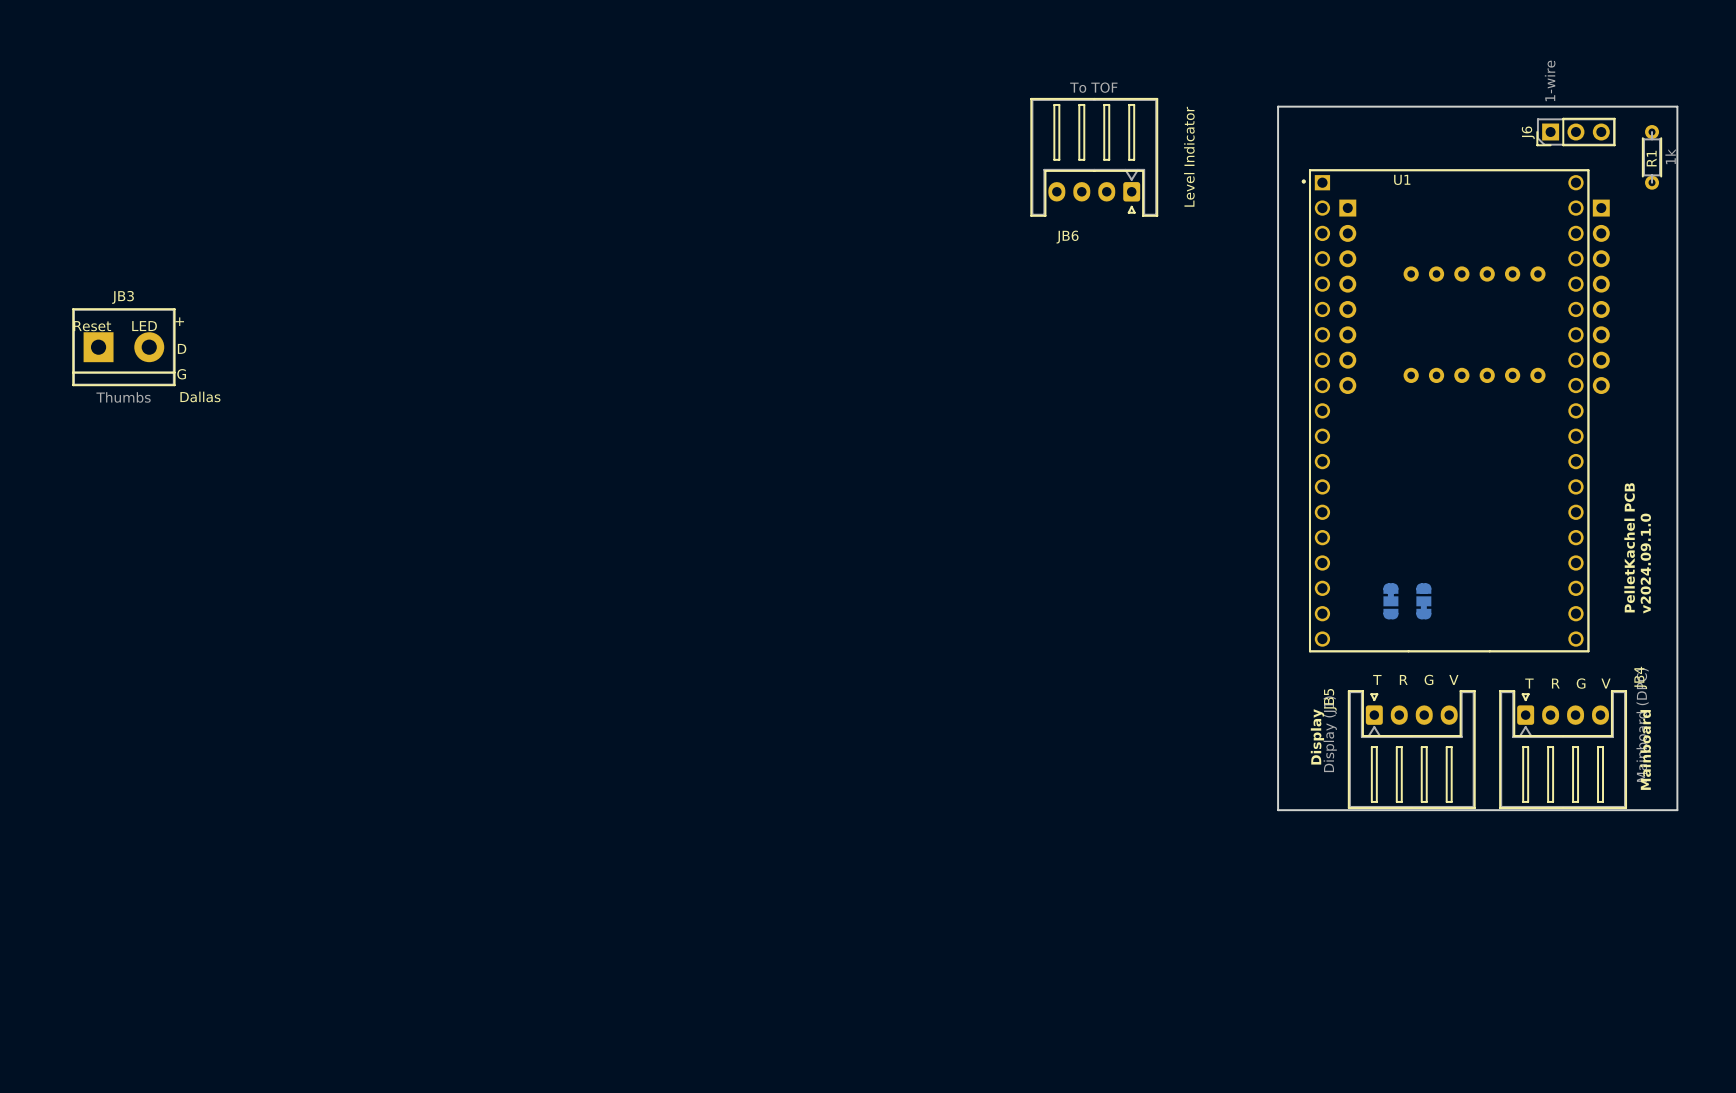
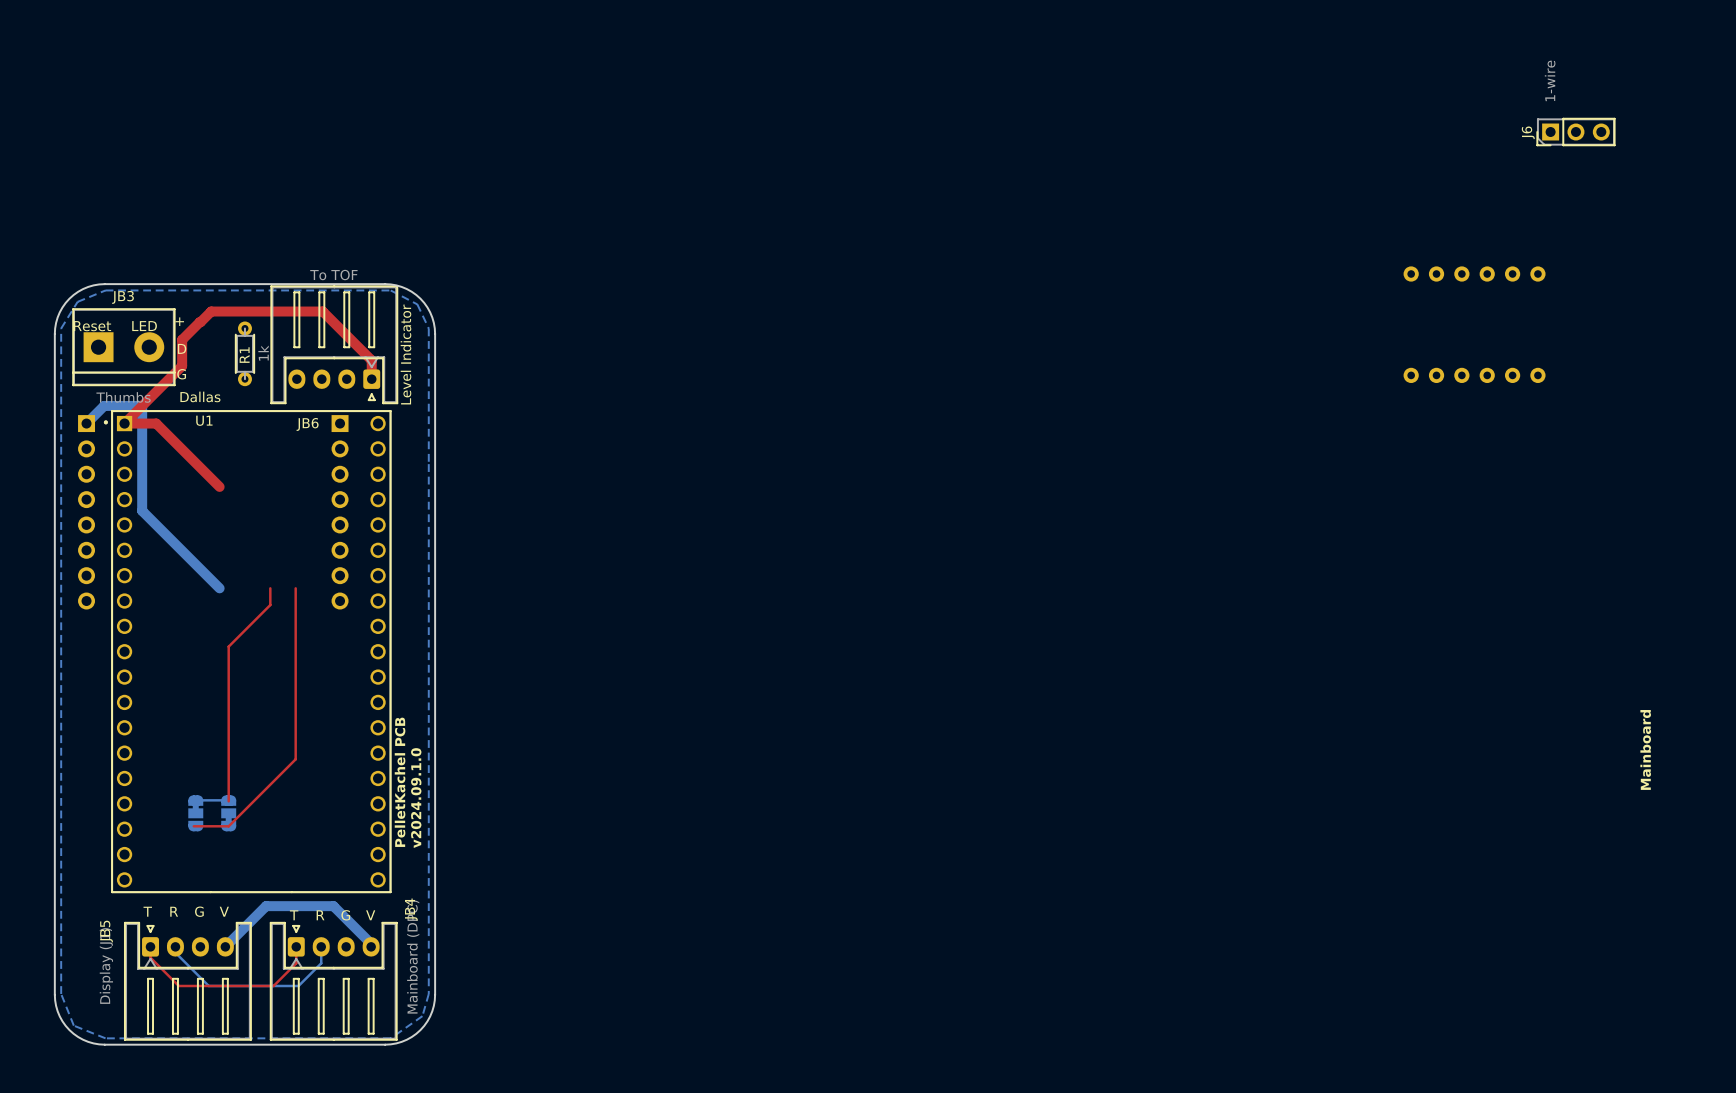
board edge: (1278, 106) (1677, 106) (1677, 810) (1278, 810) (1278, 106) -> none
text: Level Indicator (1189, 156) -> none
JB6 position: (1094, 157) -> (334, 344)
R1 position: (1652, 157) -> (244, 353)
board edge: none -> (104, 284) (390, 284) (401, 286) (416, 295) (424, 302) (432, 317) (435, 334) (435, 994) (433, 1005) (427, 1021) (416, 1033) (401, 1041) (385, 1044) (99, 1044) (83, 1039) (73, 1033) (65, 1025) (57, 1011) (54, 994) (55, 328) (59, 312) (73, 295) (88, 286) (104, 284)
bottom zone outline: none -> (105, 290) (77, 301) (61, 328) (61, 993) (73, 1025) (105, 1038) (390, 1038) (422, 1016) (428, 993) (428, 328) (417, 304) (390, 290) (105, 290)
part: (1347, 296) -> none
part: (1601, 296) -> none
text: none -> Level Indicator (405, 354)
top track: none -> (371, 379) (371, 360) (322, 311) (211, 311) (182, 339) (182, 365) (124, 423) (156, 423) (219, 486)
U1 position: (1445, 410) -> (247, 651)
bottom track: none -> (86, 423) (104, 405) (142, 405) (142, 510) (219, 588)
part: none -> (86, 512)
part: none -> (340, 512)
text: PelletKachel PCB (1629, 547) -> none
text: v2024.09.1.0 (1645, 563) -> none
top track: none -> (270, 588) (270, 605) (228, 646) (228, 801)
top track: none -> (295, 588) (295, 759) (228, 826) (193, 826)
part: (1390, 601) -> none
part: (1423, 601) -> none
text: T (1377, 679) -> none
text: R (1403, 679) -> none
text: G (1428, 679) -> none
text: V (1453, 679) -> none
text: T (1529, 683) -> none
text: R (1555, 683) -> none
text: G (1581, 683) -> none
text: V (1605, 683) -> none
text: Display (1317, 736) -> none
JB5 position: (1411, 749) -> (187, 981)
JB4 position: (1563, 749) -> (333, 981)
text: none -> PelletKachel PCB (400, 782)
text: none -> v2024.09.1.0 (416, 798)
bottom track: none -> (195, 800) (228, 800)
part: none -> (195, 813)
part: none -> (228, 813)
text: none -> T (147, 911)
text: none -> R (174, 911)
text: none -> G (199, 911)
text: none -> V (224, 911)
text: none -> T (294, 915)
text: none -> R (320, 915)
text: none -> G (345, 915)
text: none -> V (370, 915)
top track: none -> (150, 946) (150, 957) (178, 985) (273, 985) (296, 963) (296, 946)
bottom track: none -> (175, 946) (175, 952) (208, 985) (298, 985) (321, 963) (321, 946)
bottom track: none -> (225, 946) (266, 906) (333, 906) (371, 943) (371, 946)

